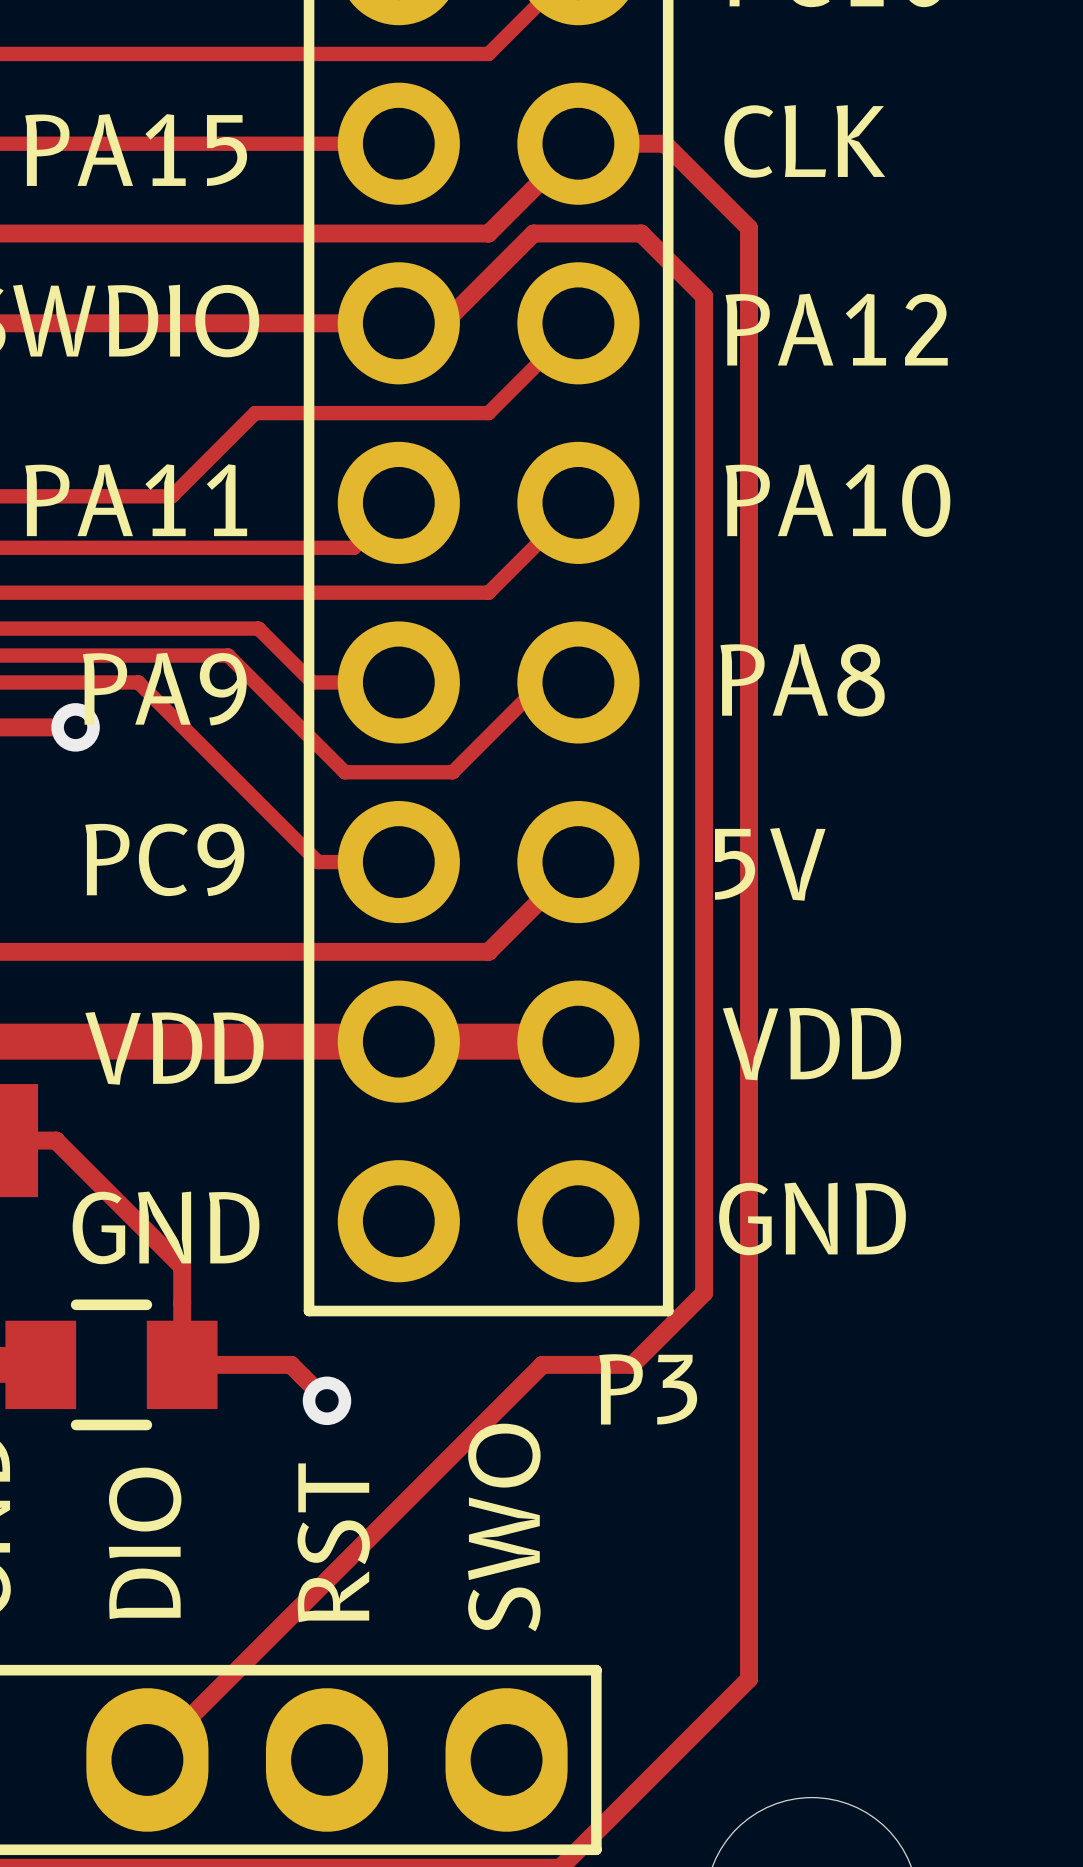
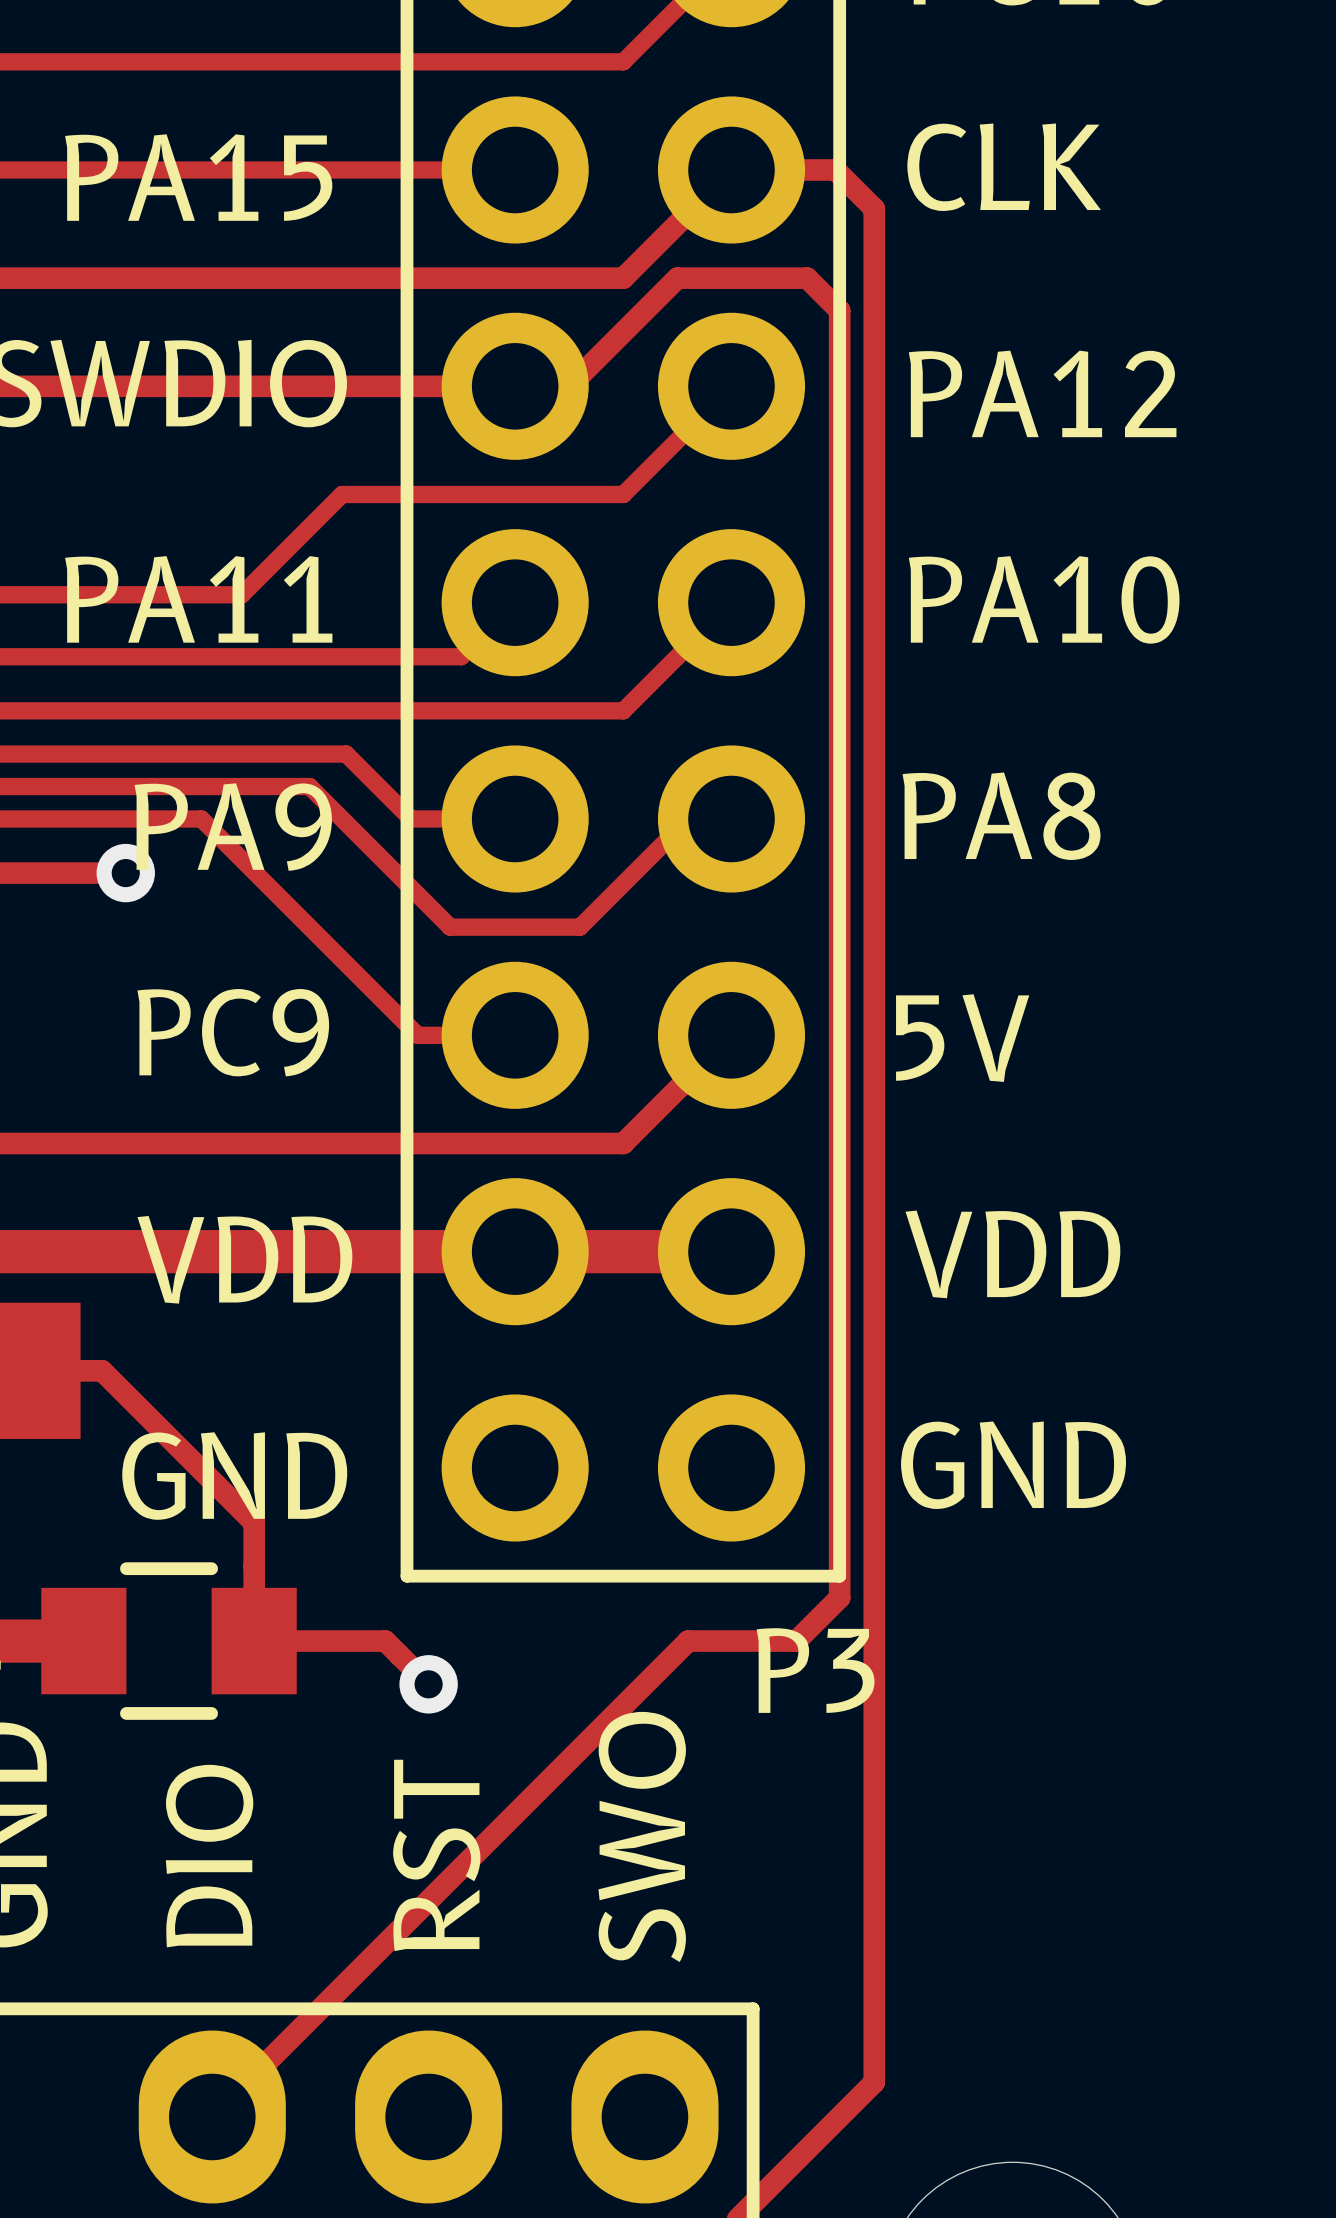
track: (696, 175) (749, 227) (749, 1679) (696, 1731) -> (874, 208) (874, 2082)
track: (668, 260) (704, 296) (704, 1293) (668, 1328) -> (839, 310) (839, 1597)

